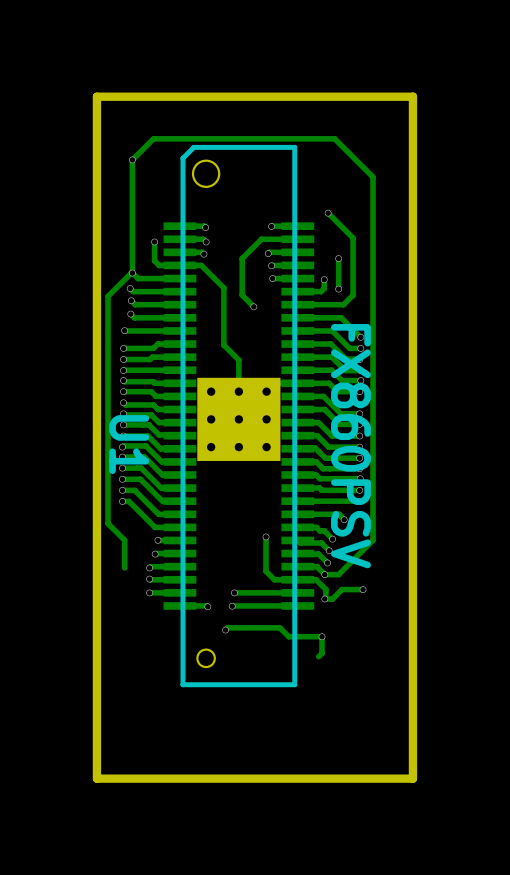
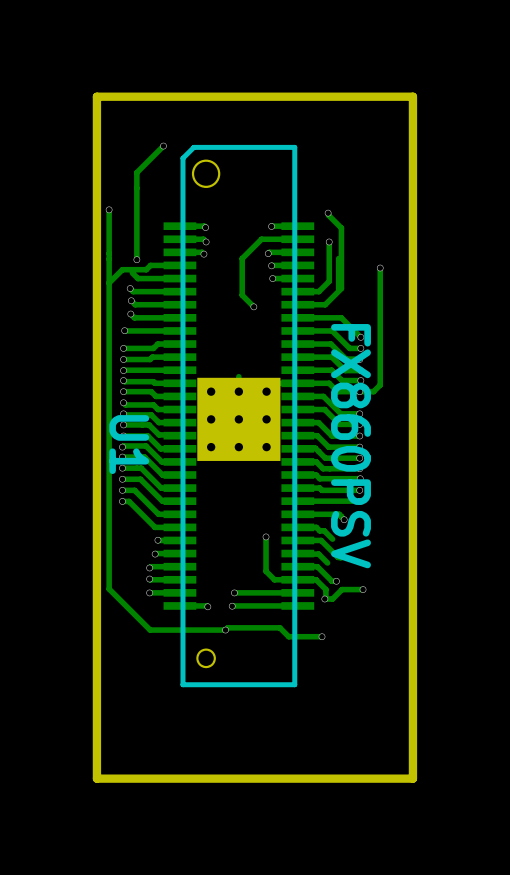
track: none -> (163, 146) (136, 172) (136, 259)
via: none -> (163, 146)
via: (132, 159) -> none
track: none -> (109, 209) (109, 589) (150, 630) (225, 630)
via: none -> (109, 209)
track: (328, 213) (353, 238) (353, 295) (343, 304) (325, 304) -> (328, 214) (341, 228) (341, 288) (325, 304)
track: (154, 241) (154, 260) (159, 265) -> (109, 283) (122, 269) (146, 269) (150, 265) (159, 265)
via: (154, 241) -> none
via: none -> (329, 241)
via: (338, 258) -> none
via: none -> (136, 259)
track: (179, 265) (201, 265) (223, 287) (223, 345) (238, 360) (238, 376) -> none
track: none -> (380, 268) (380, 385) (373, 391) (359, 391)
via: none -> (380, 268)
via: (132, 273) -> none
track: (324, 279) (324, 288) (318, 291) -> (329, 241) (329, 281) (318, 291)
via: (324, 279) -> none
via: (338, 289) -> none
via: (332, 539) -> none
track: (297, 540) (300, 543) (321, 543) (329, 550) -> (297, 540) (321, 540) (340, 557)
via: (329, 550) -> none
via: (327, 562) -> none
track: (316, 566) (324, 574) (338, 574) (373, 540) (373, 177) (334, 138) (153, 138) (132, 159) (132, 273) (108, 296) (108, 523) (124, 540) (124, 567) -> (316, 566) (332, 581) (336, 581)
via: (324, 574) -> none
via: none -> (336, 581)
track: (322, 636) (322, 653) (318, 656) -> none

